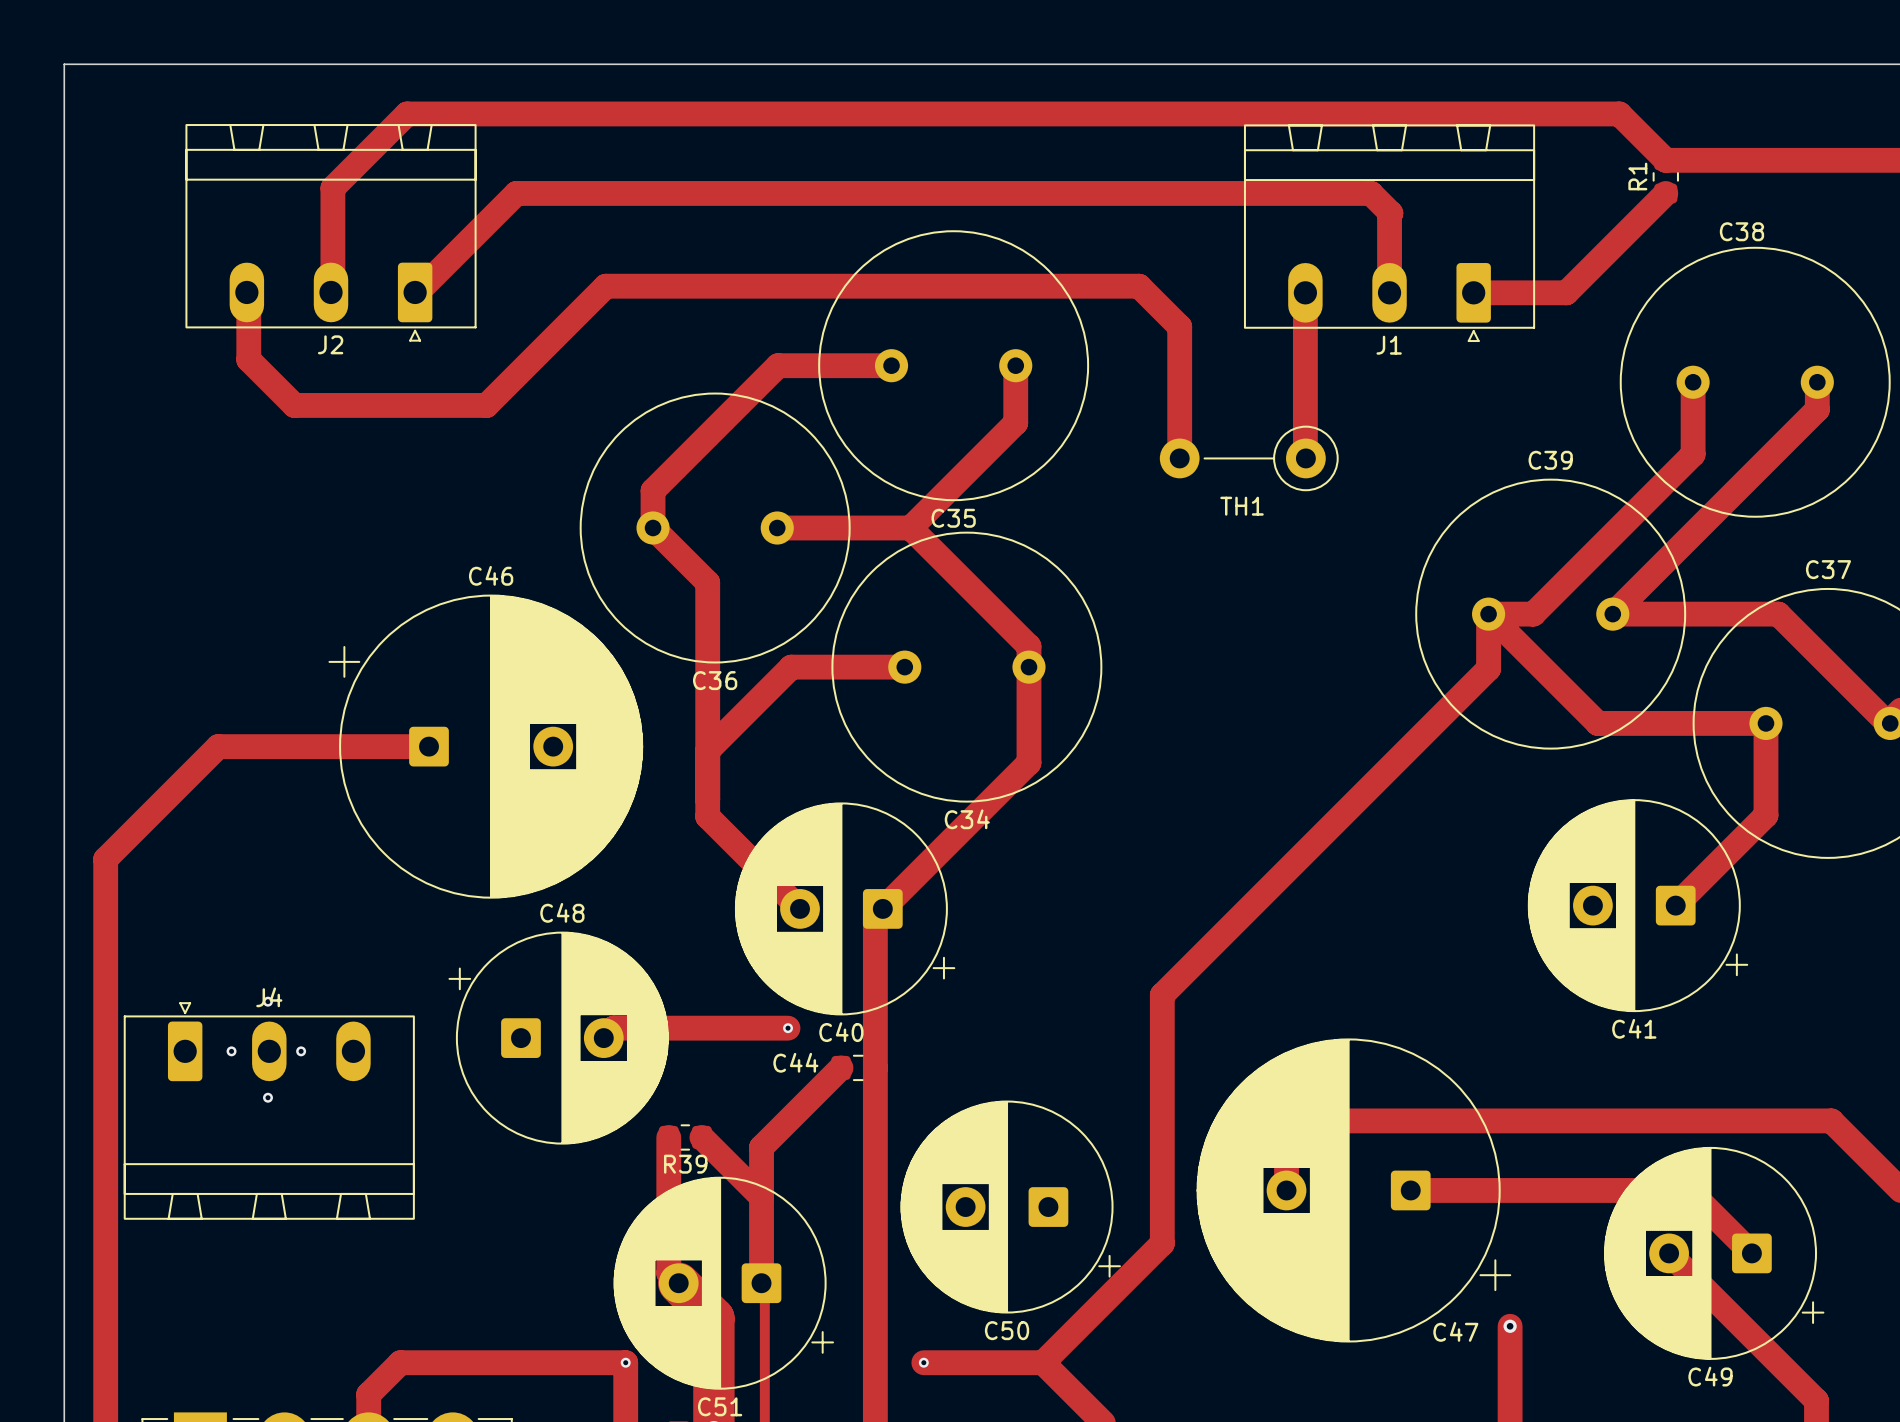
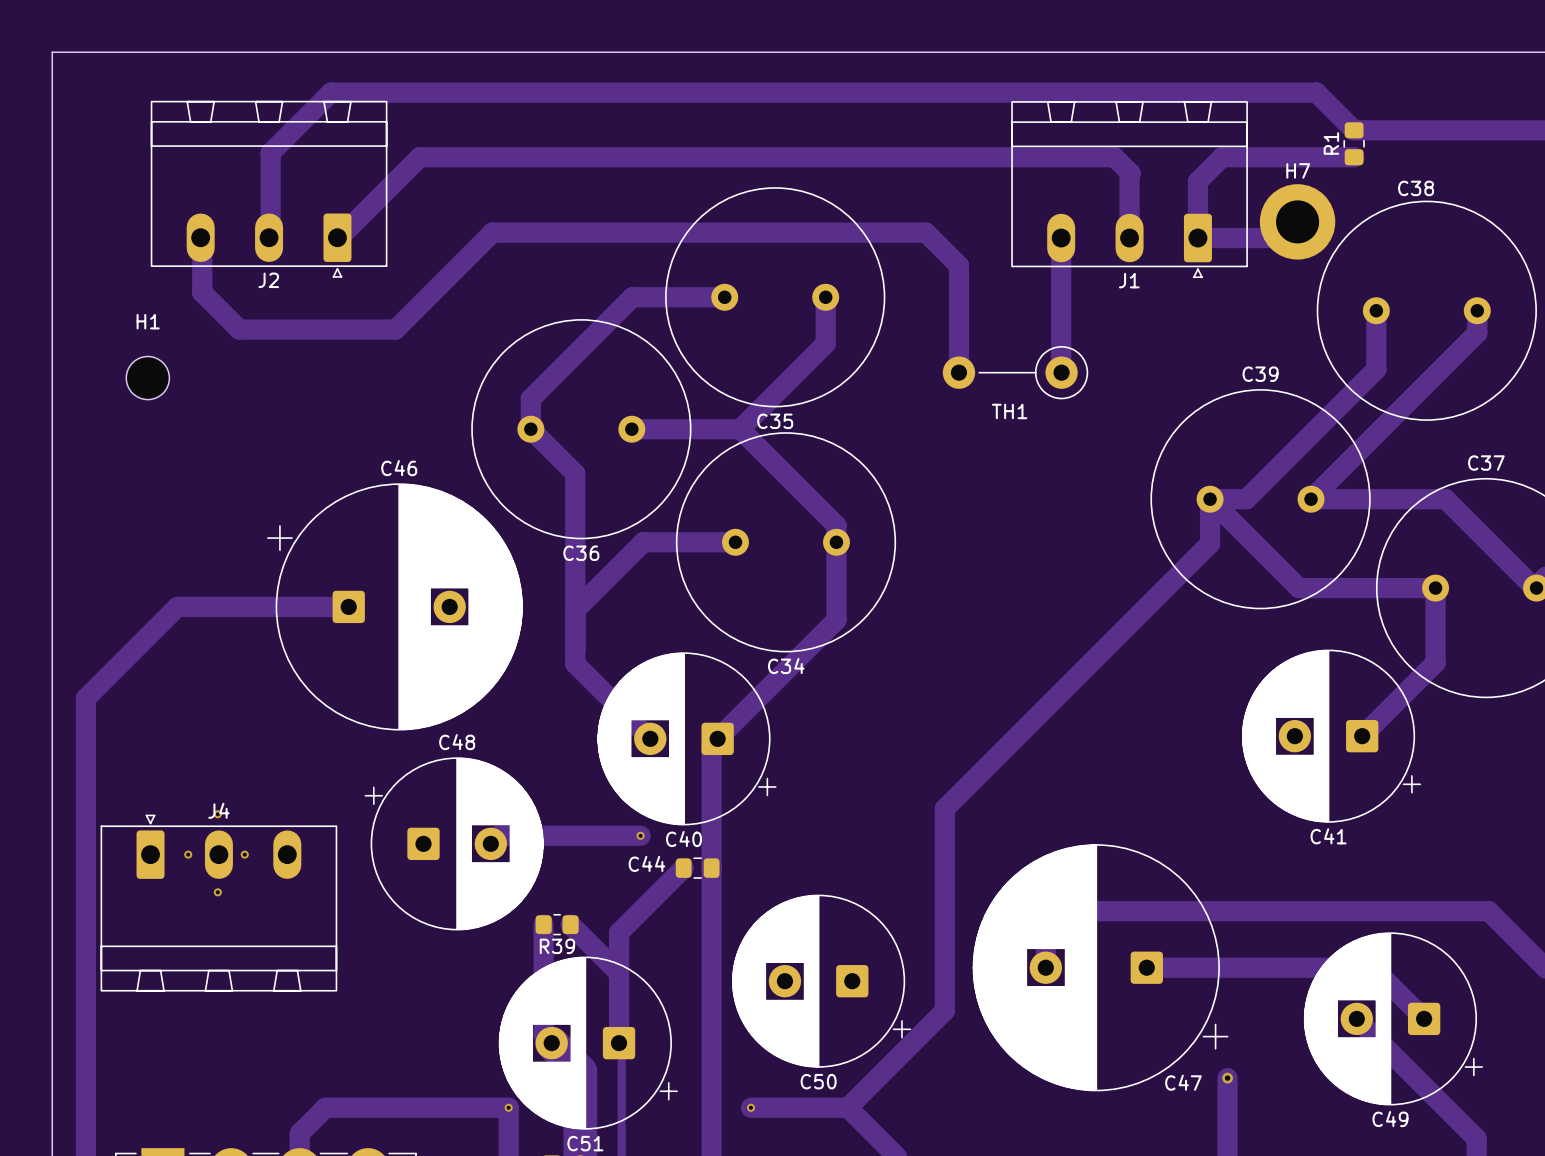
track: (1665, 193) (1566, 292) -> (1354, 157) (1222, 157) (1197, 181) (1197, 238)
H7: none -> (1297, 221)
H1: none -> (147, 378)

